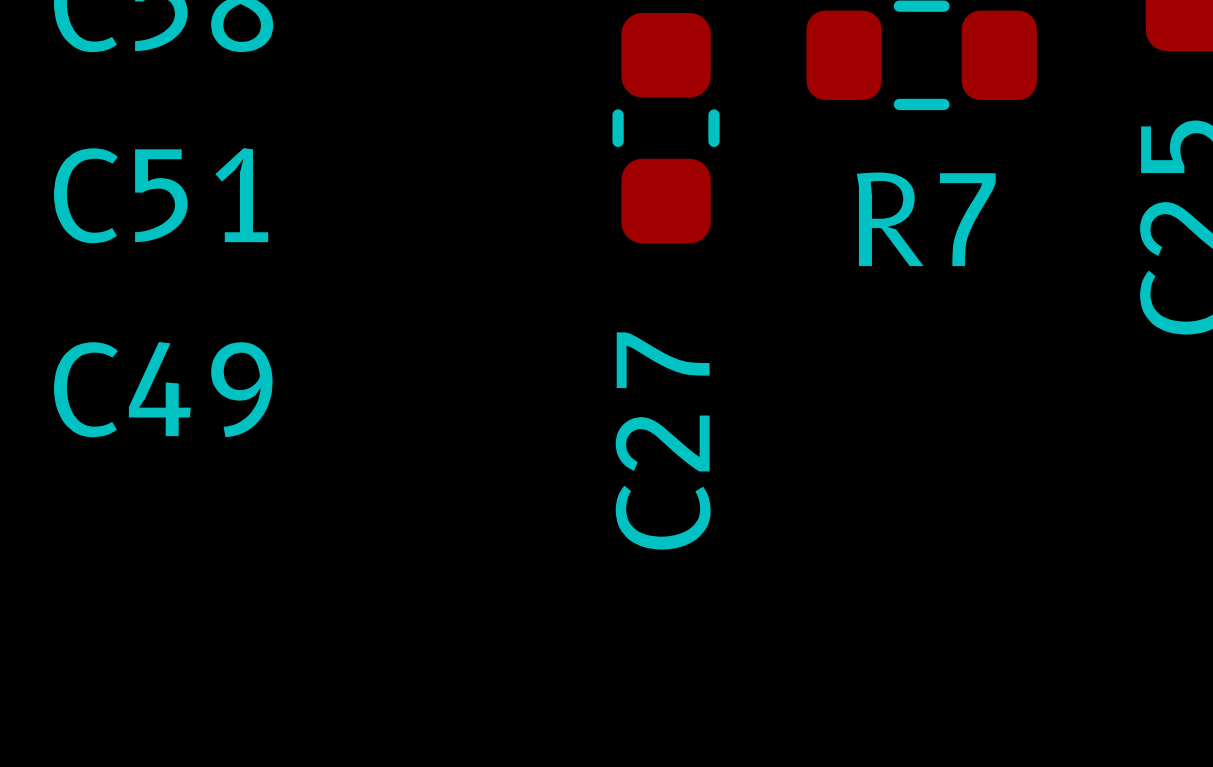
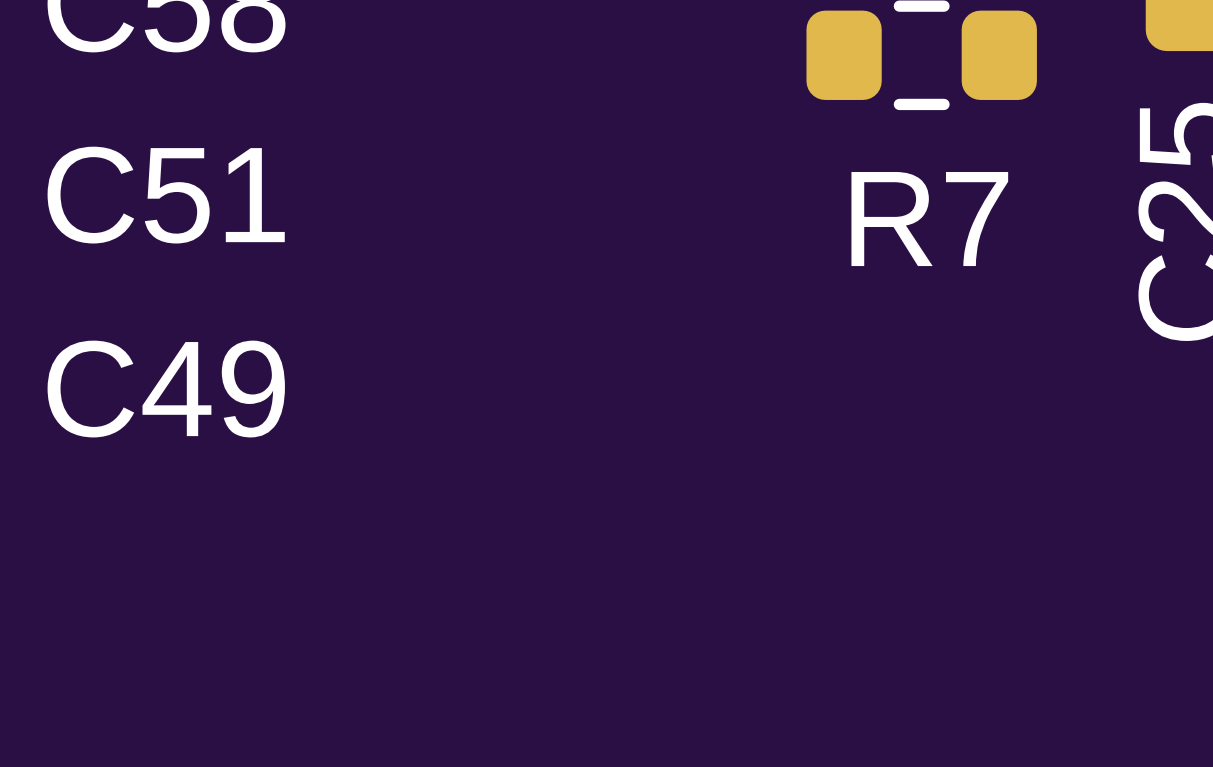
C27: (666, 128) -> none

